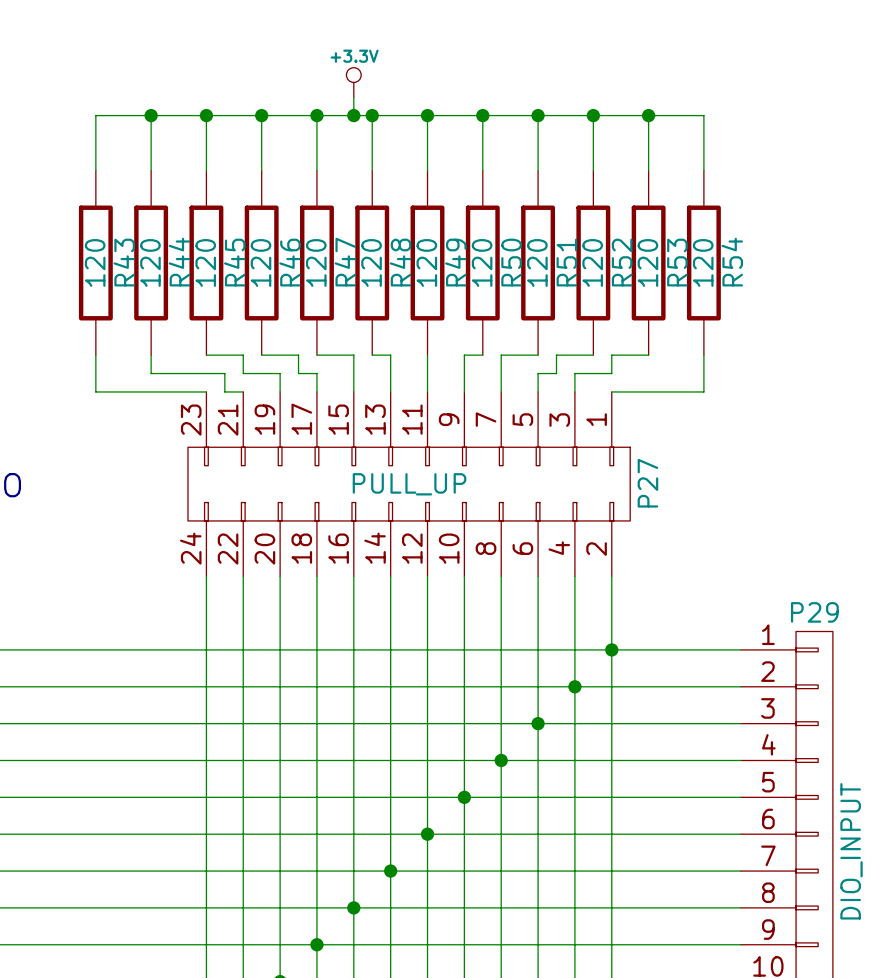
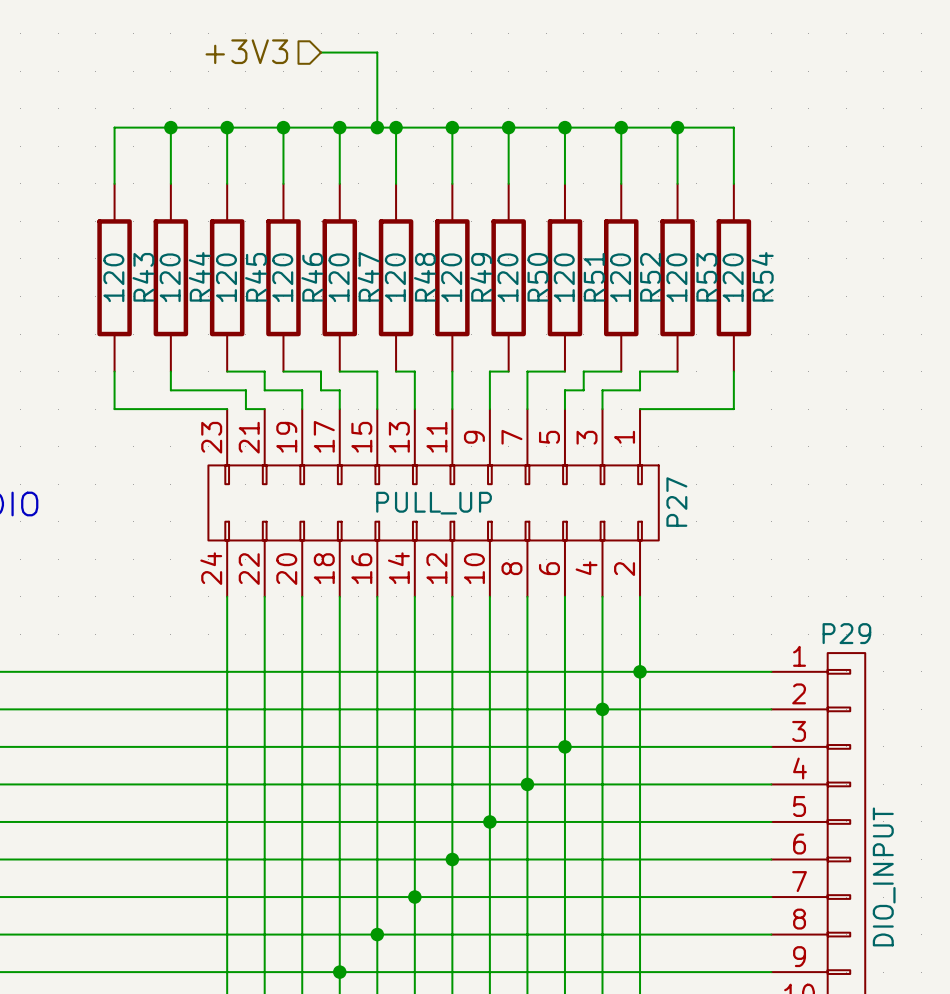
hierarchical label: none -> +3V3 (246, 51)
wire: none -> (321, 52) (377, 52) (377, 108)
power symbol: +3.3V (353, 82) -> none

